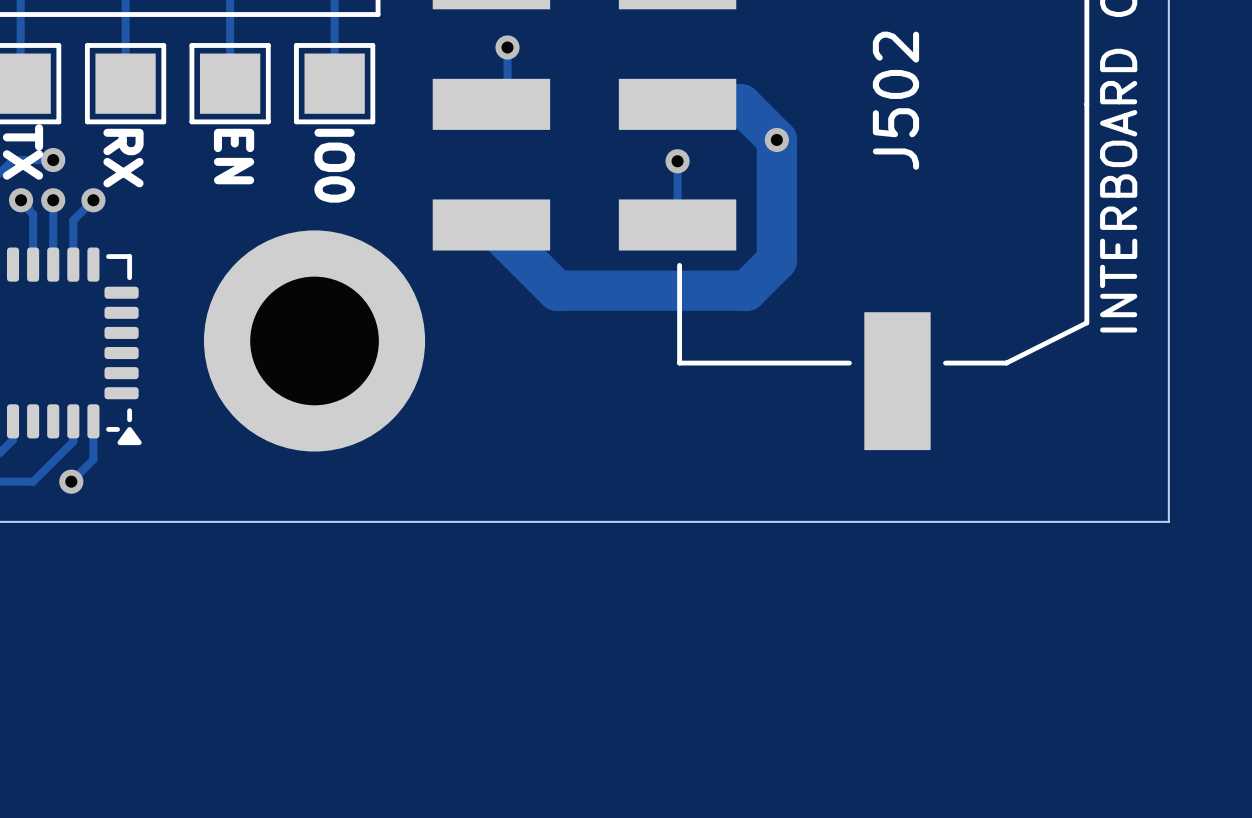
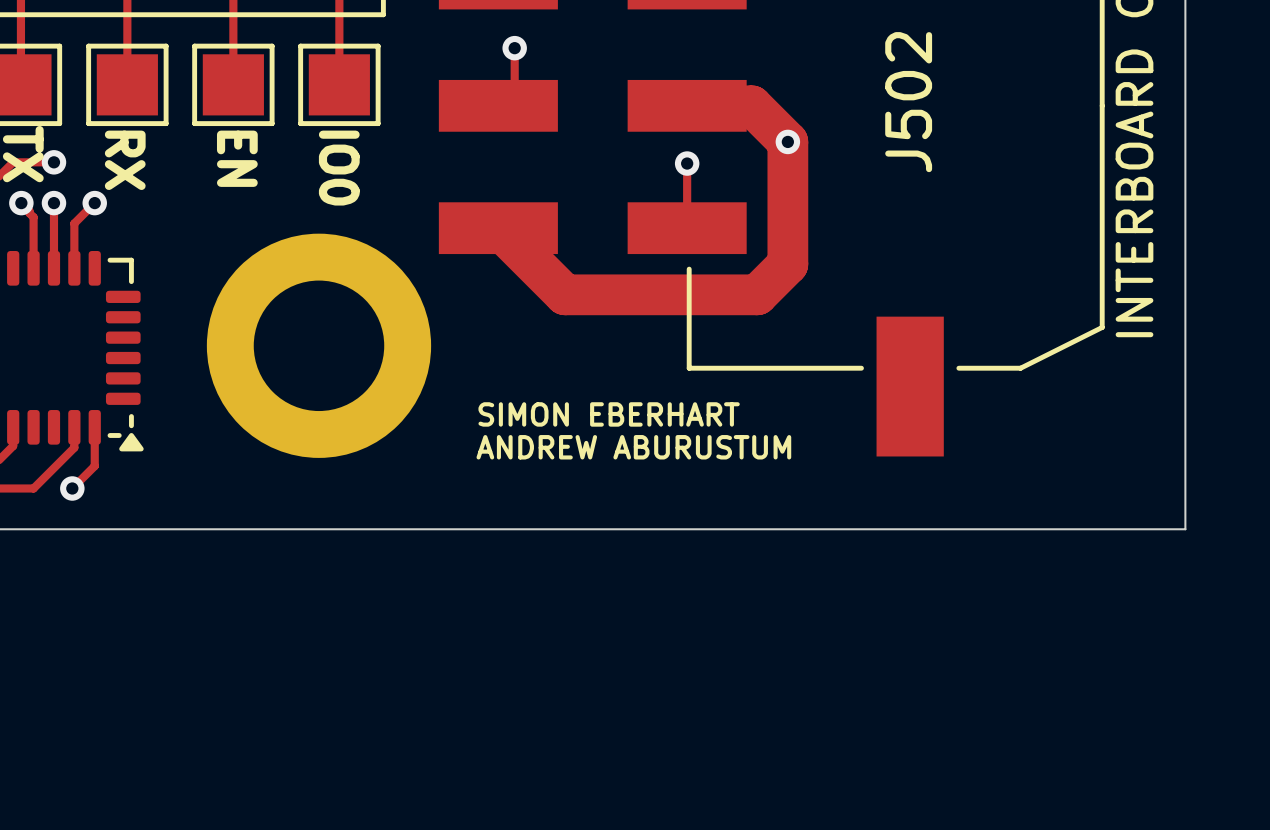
text: none -> SIMON EBERHART (609, 414)
text: none -> ANDREW ABURUSTUM (633, 447)

